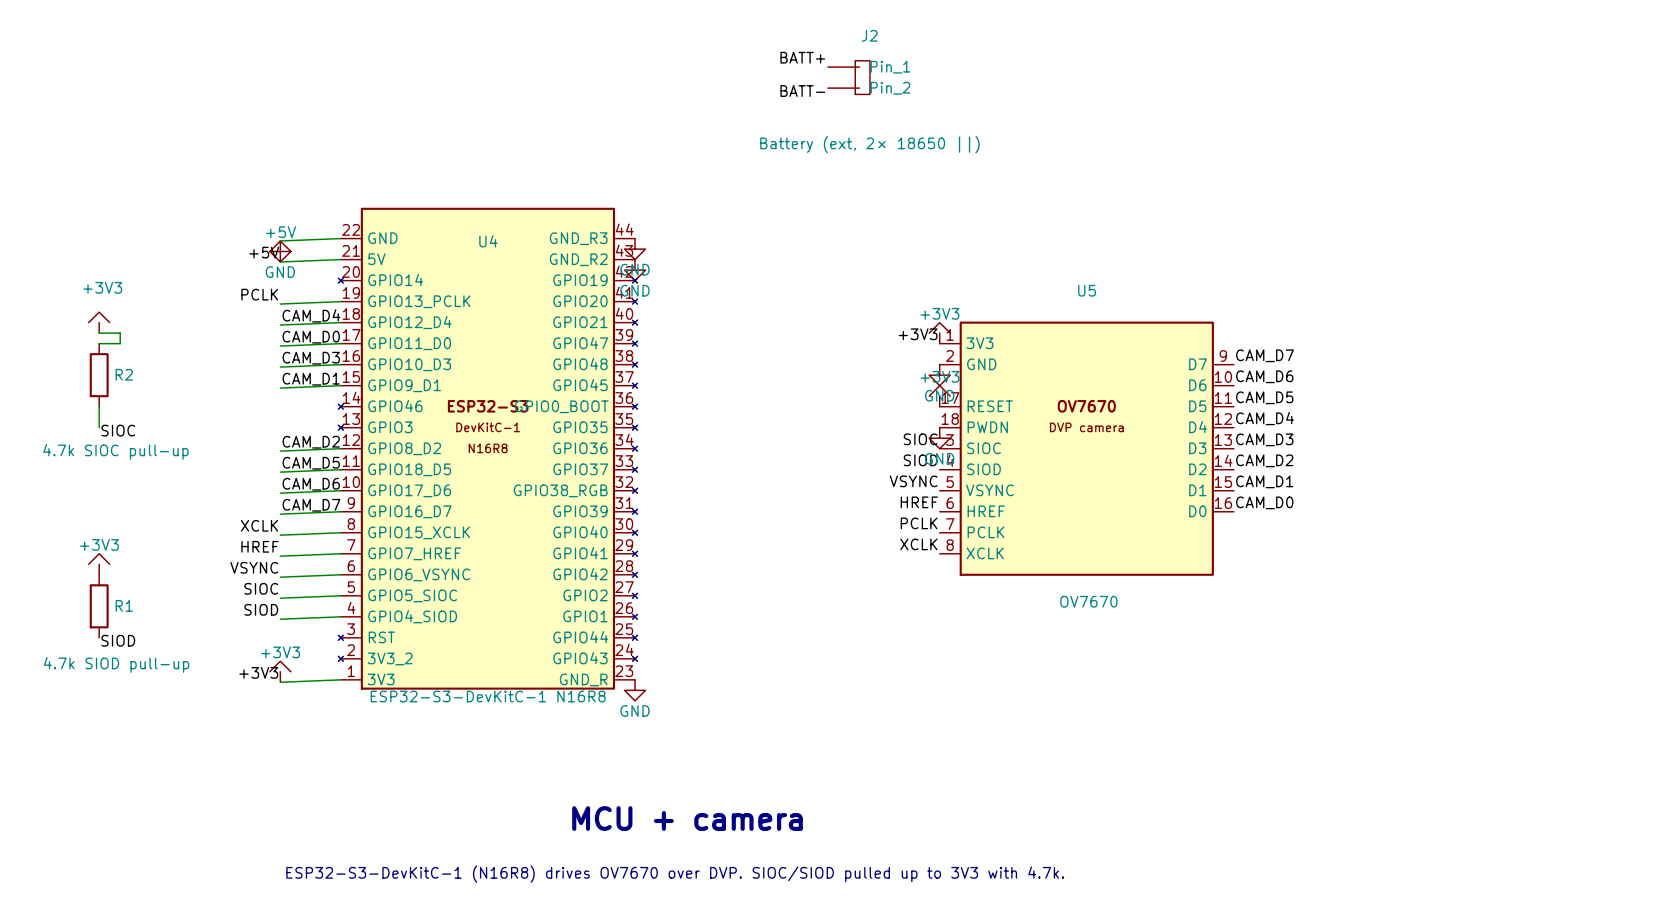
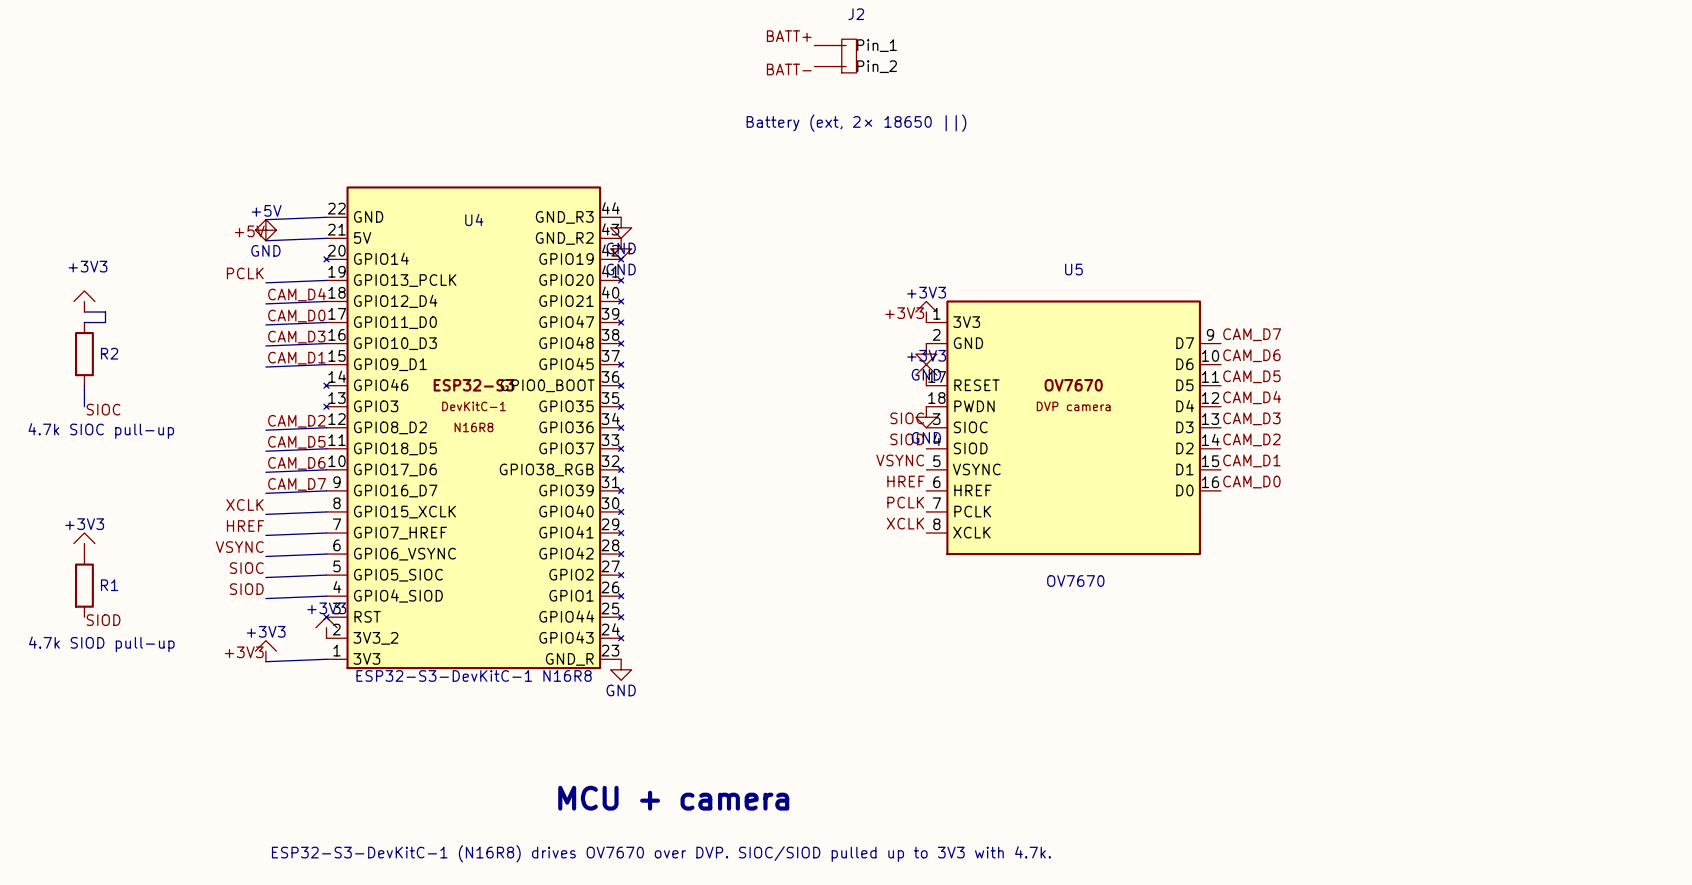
U4 symbol: [338, 207, 638, 690] -> [324, 186, 624, 670]
power symbol: none -> +3V3 (326, 627)

